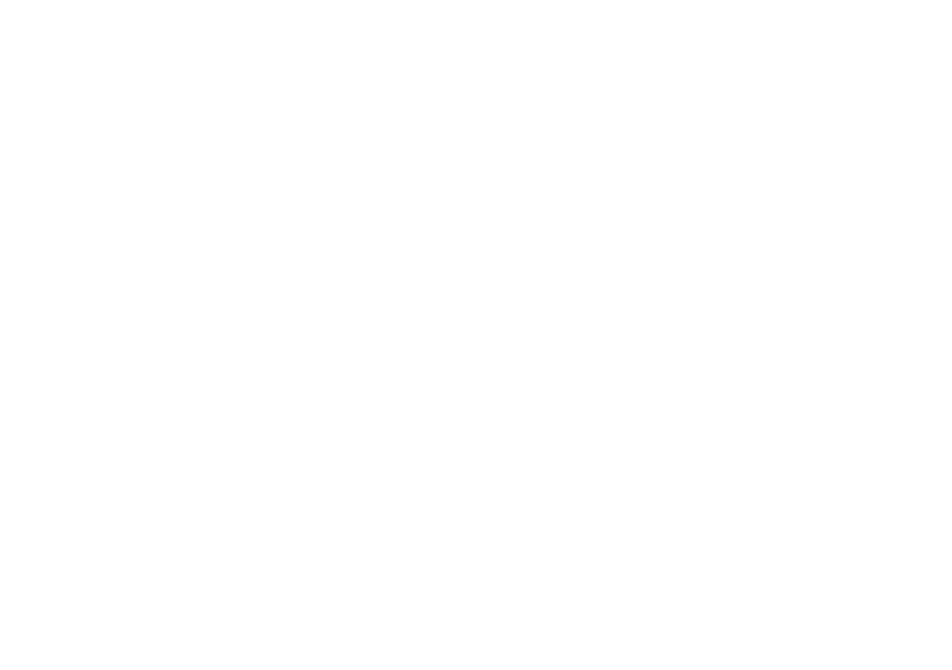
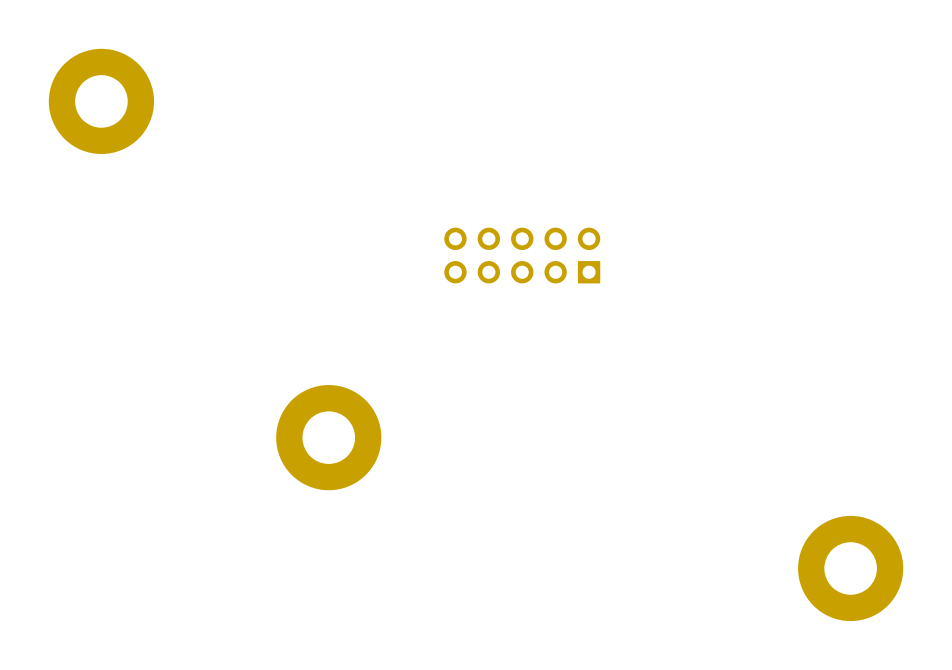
part: none -> (101, 101)
part: none -> (522, 255)
part: none -> (328, 437)
part: none -> (850, 568)

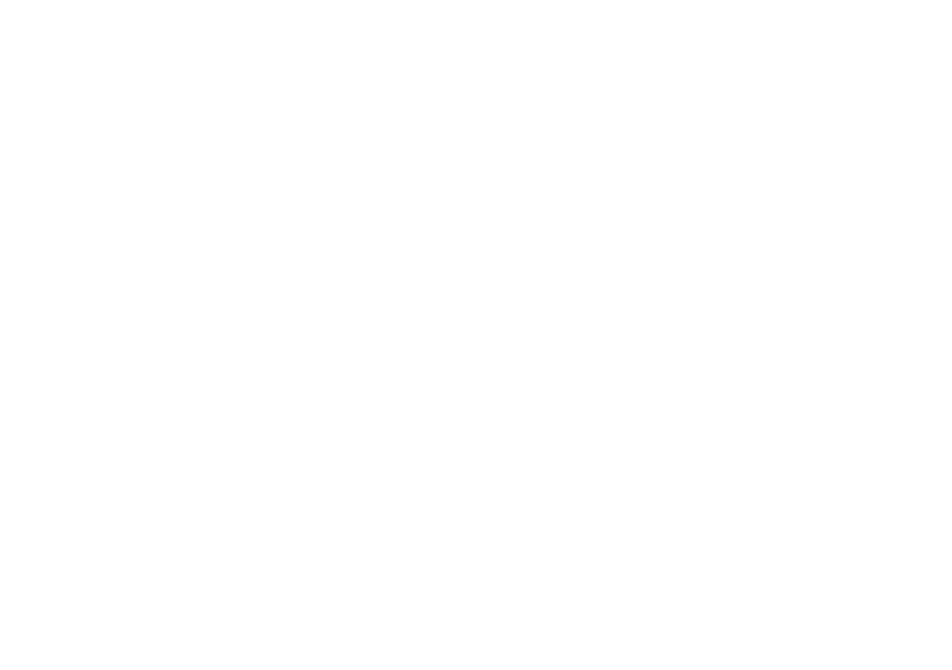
part: (101, 101) -> none
part: (522, 255) -> none
part: (328, 437) -> none
part: (850, 568) -> none

